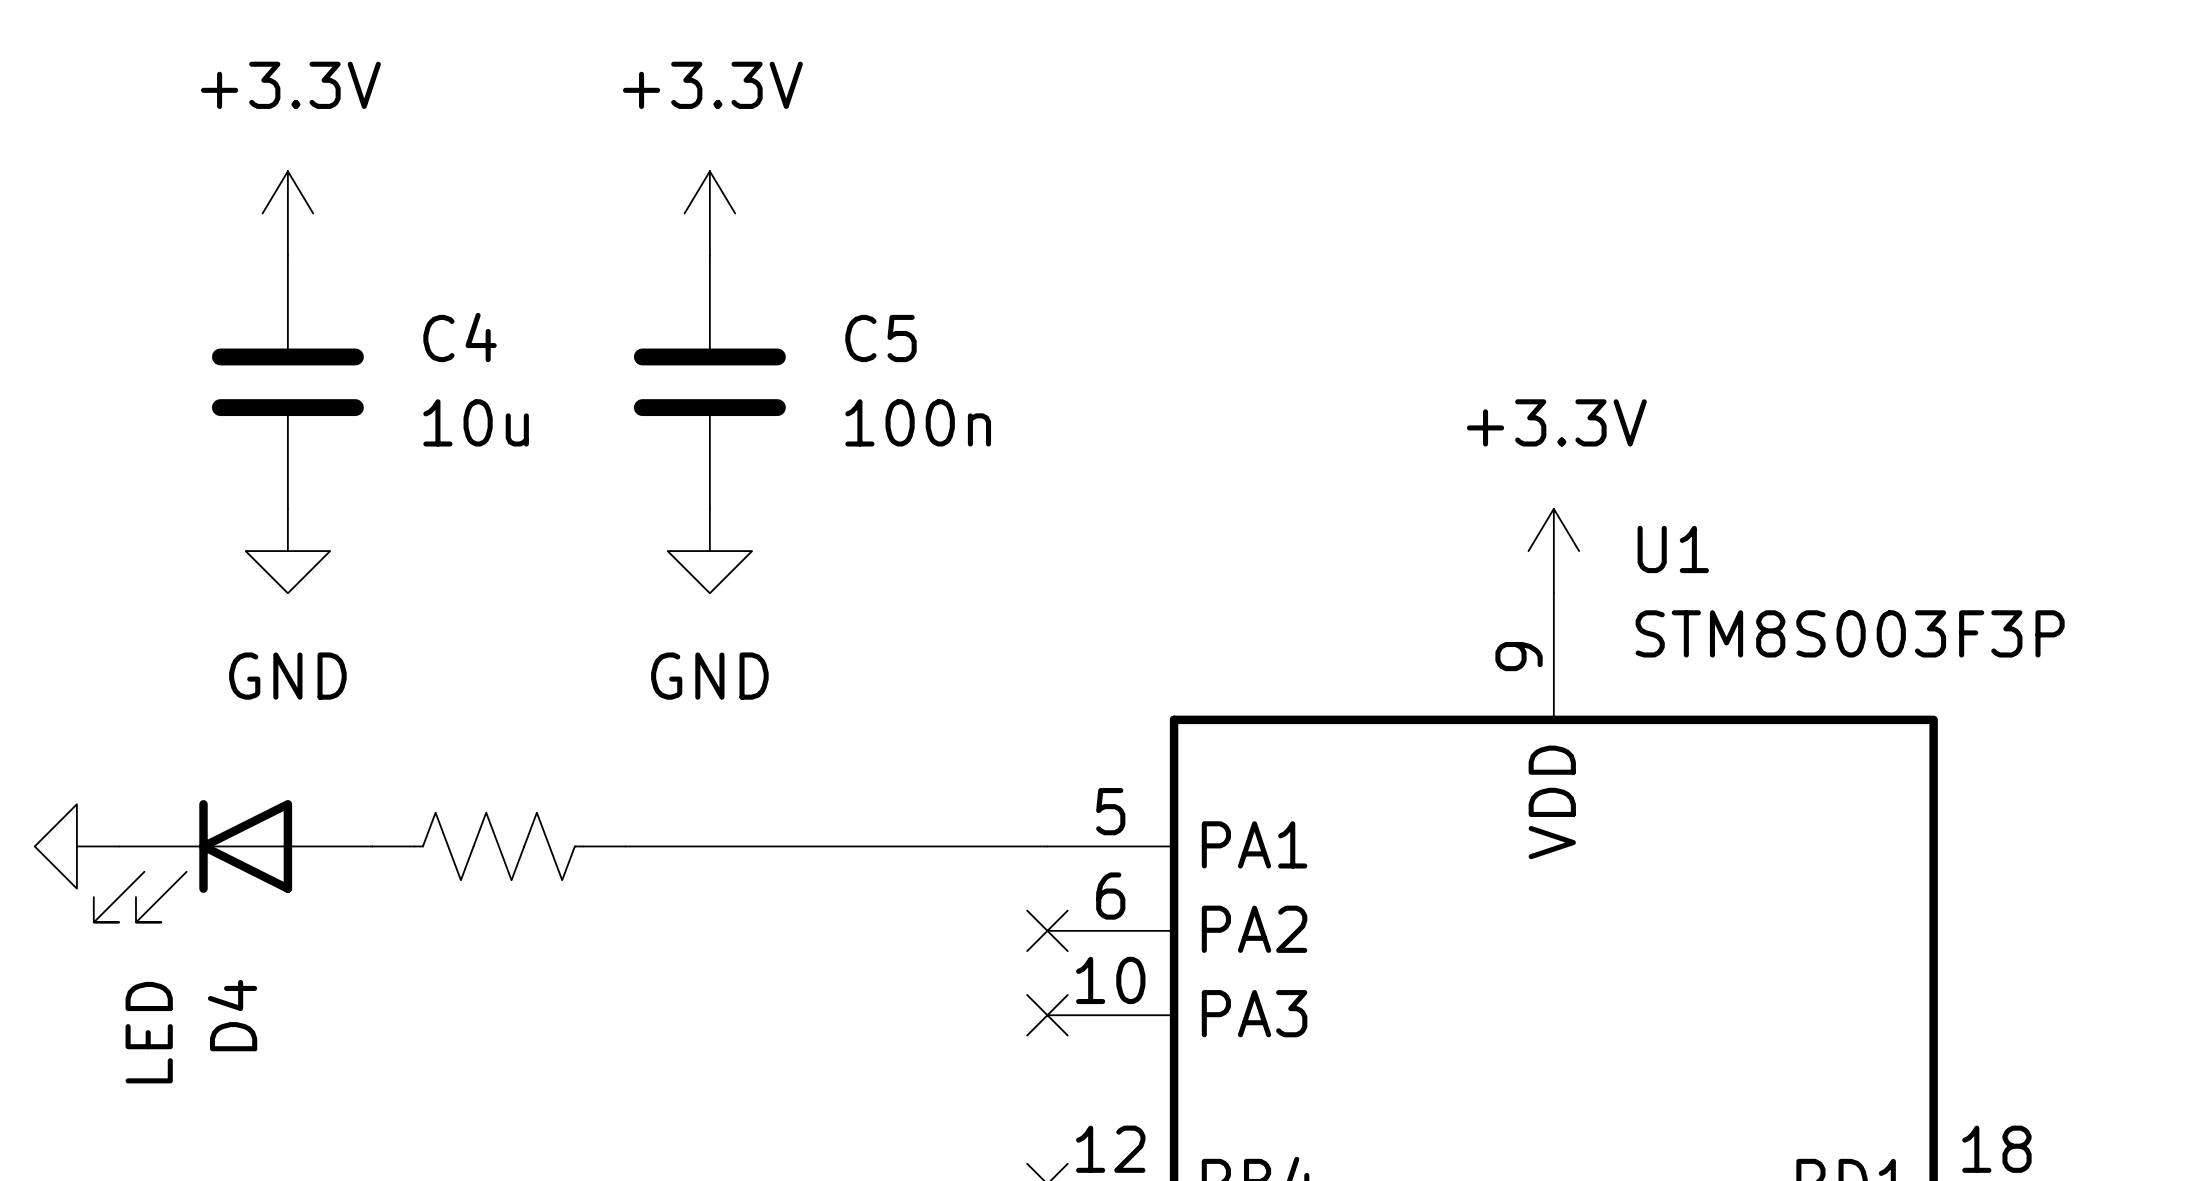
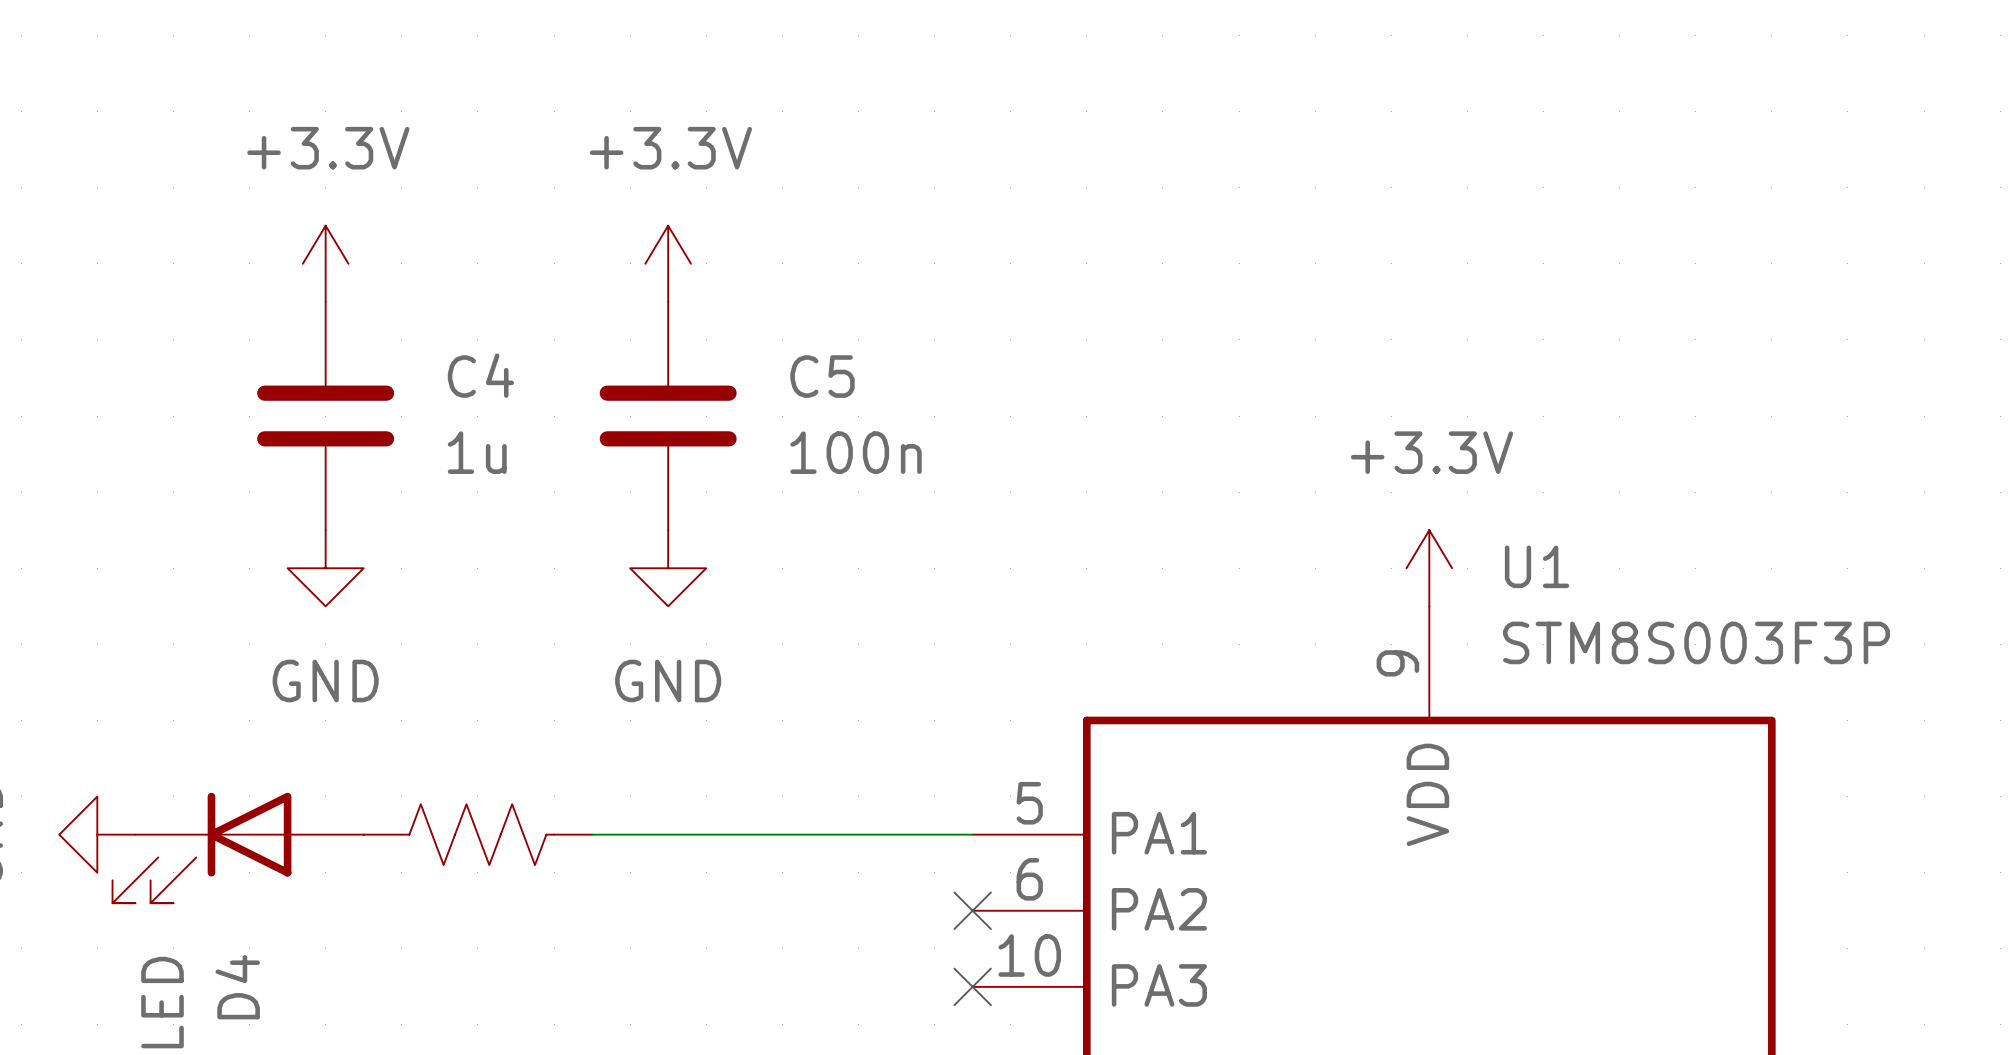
power symbol position: +3.3V (287, 213) -> +3.3V (325, 263)
C4 position: (287, 382) -> (325, 416)
C4 value: 10u (476, 422) -> 1u (477, 452)
power symbol position: GND (287, 551) -> GND (325, 568)

